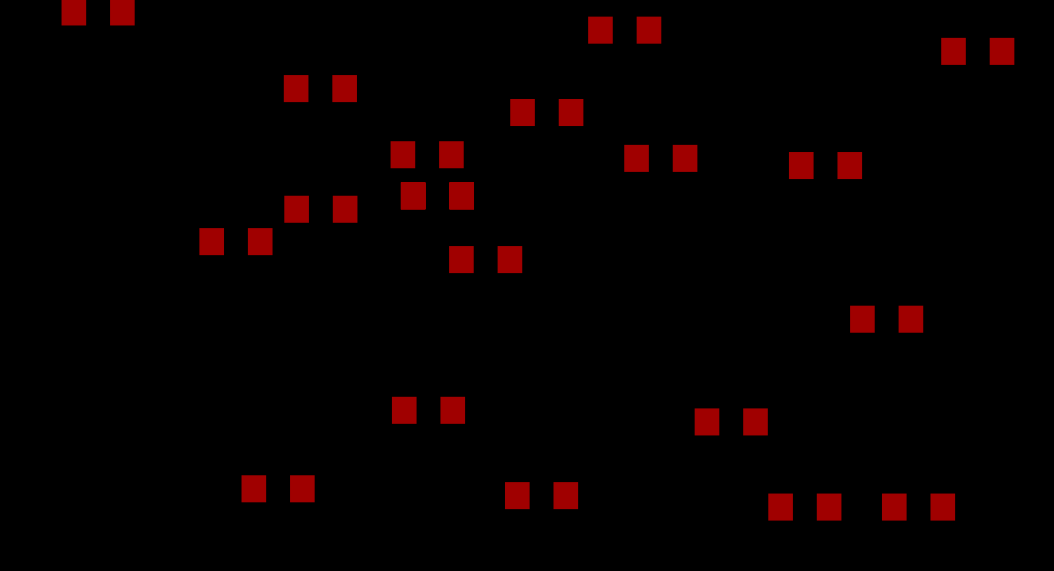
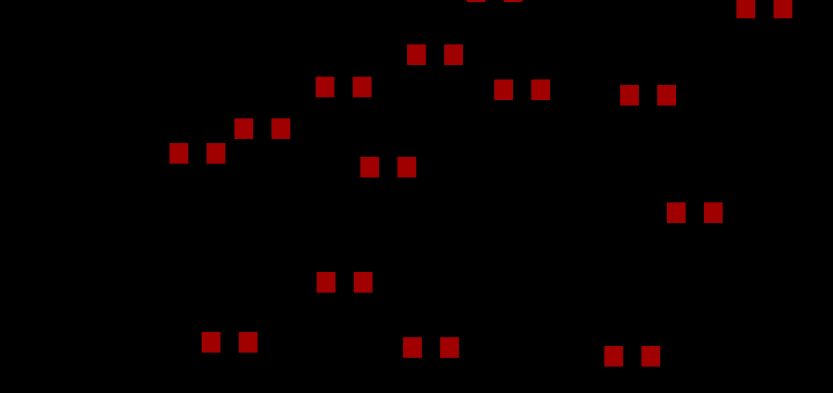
part: (320, 88) -> none
part: (437, 195) -> none
part: (731, 421) -> none
part: (918, 507) -> none

